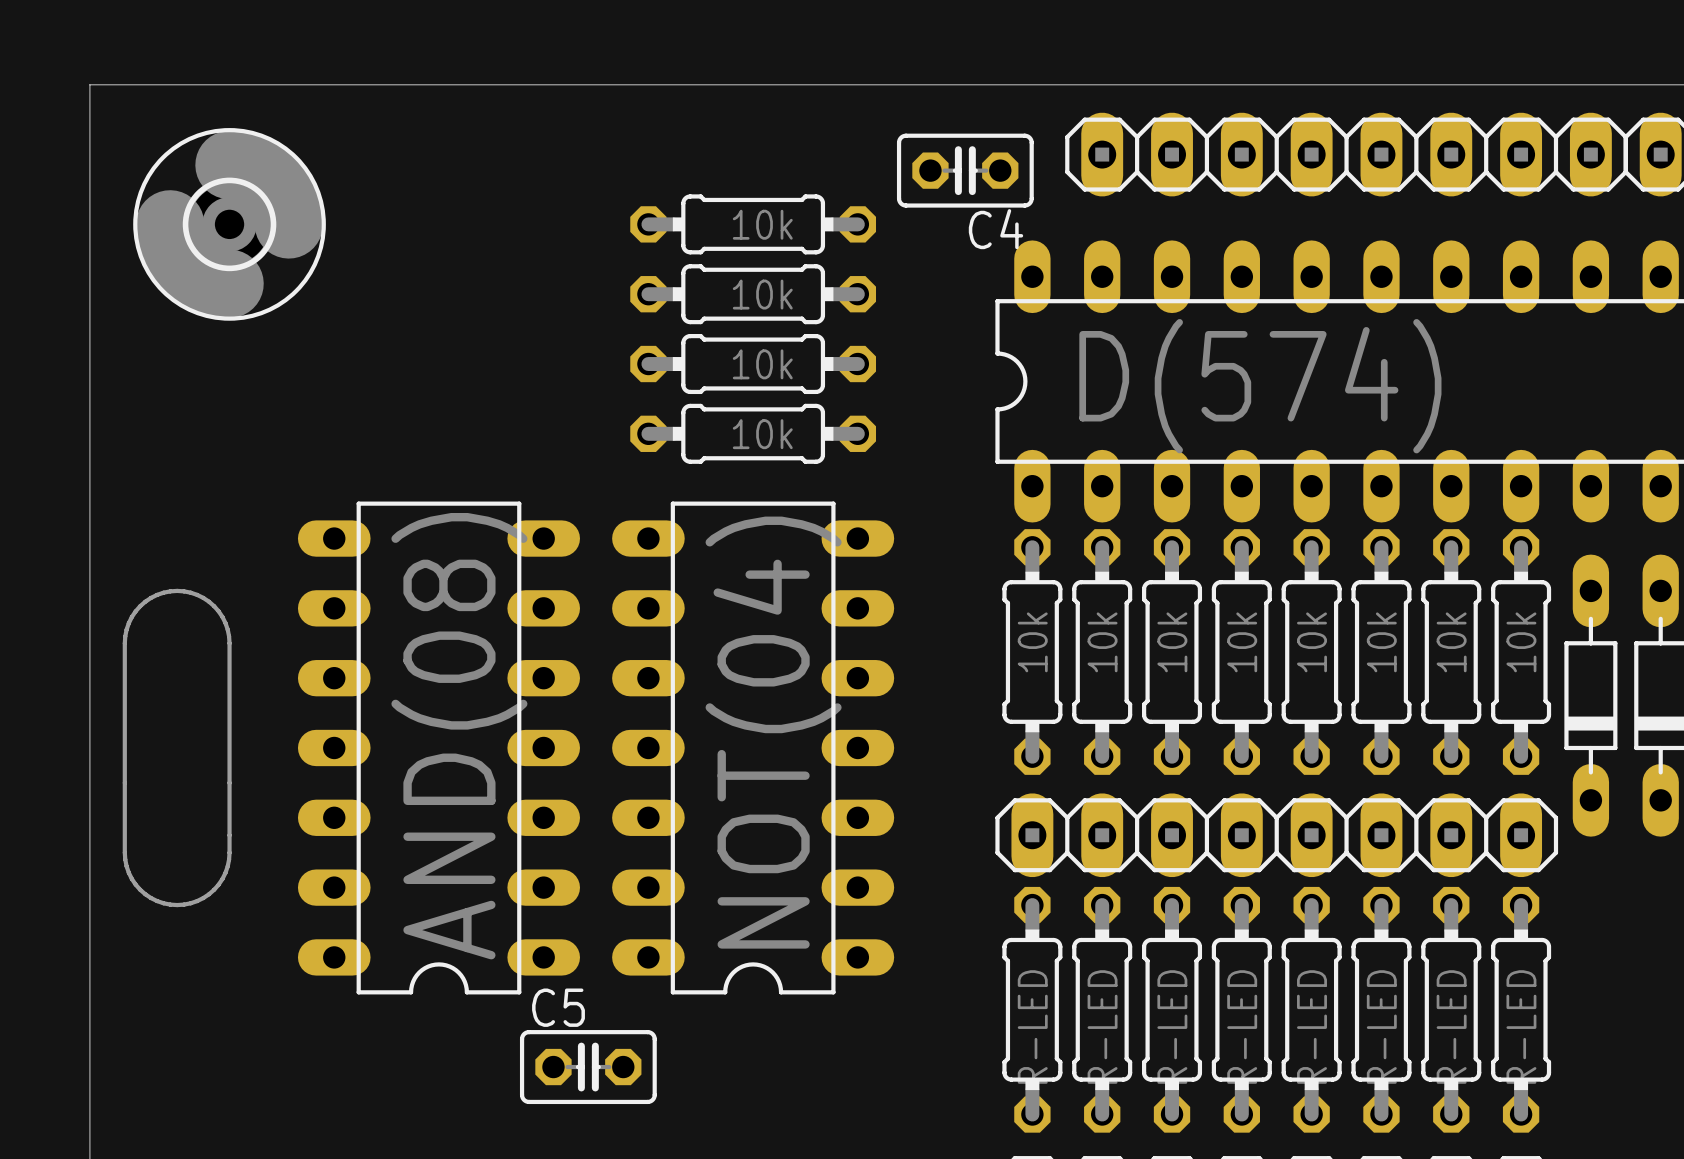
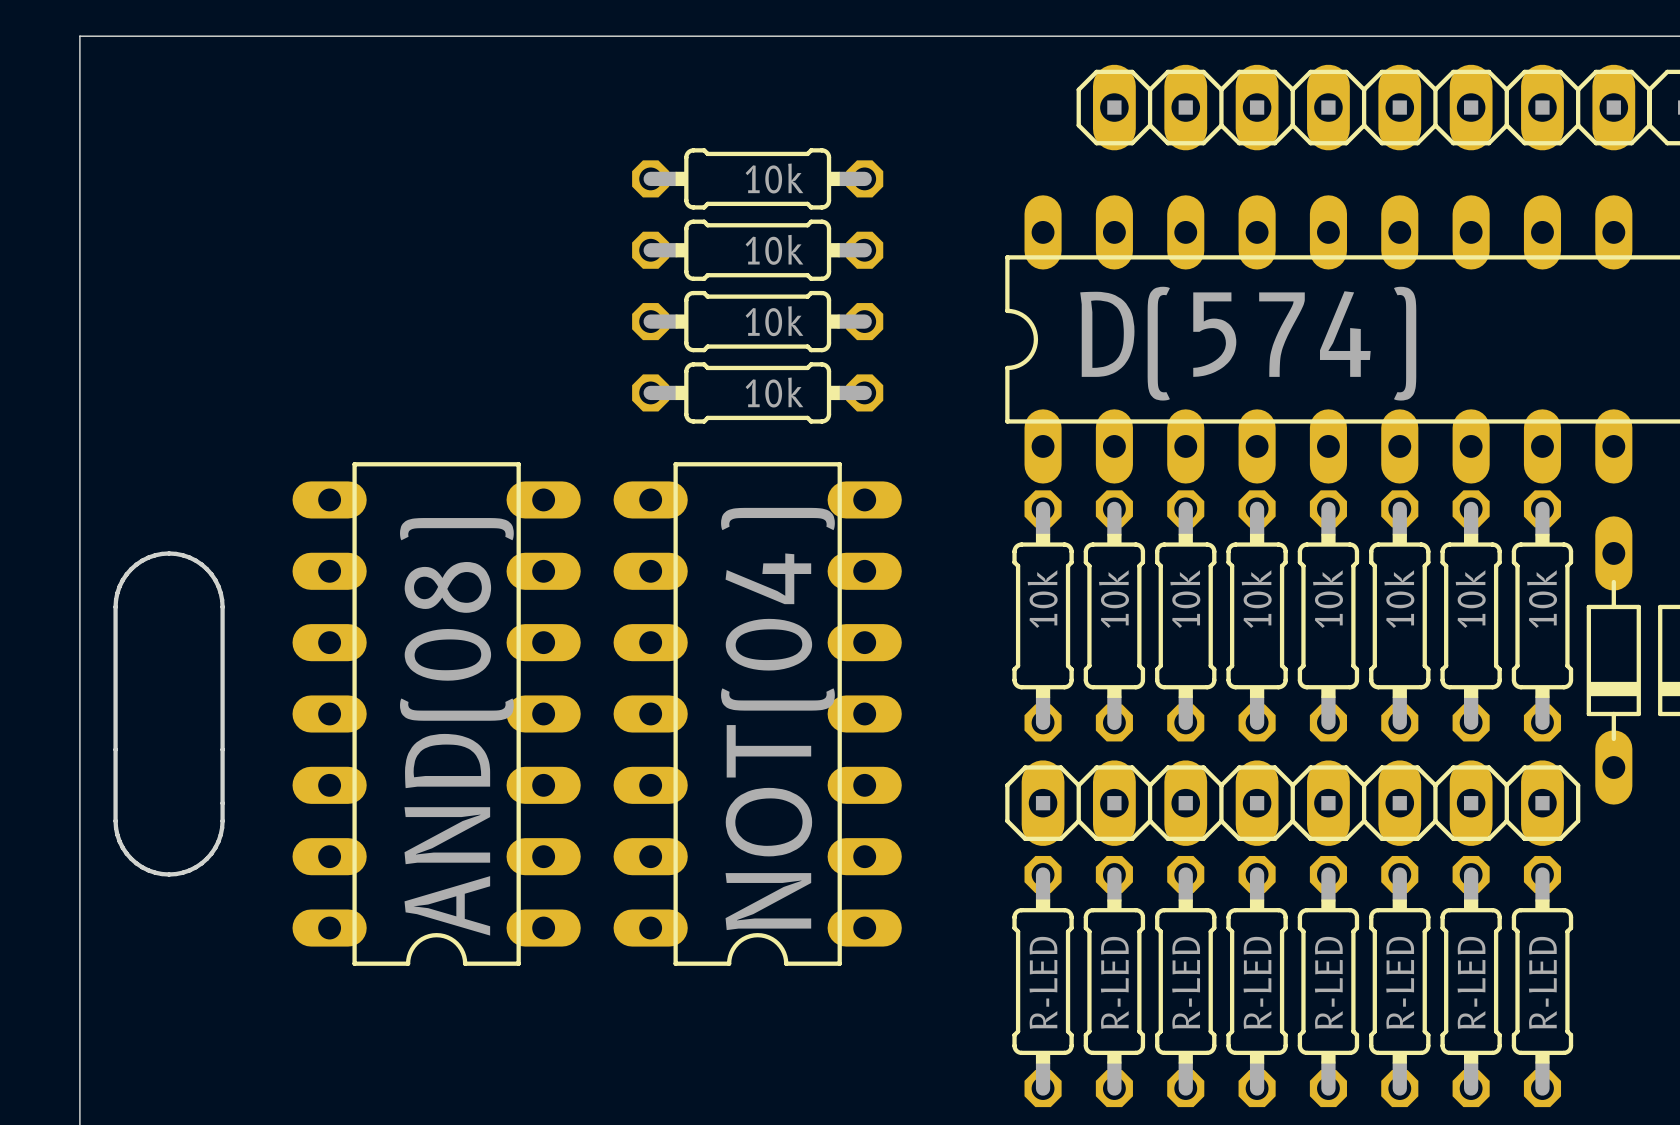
C4: (965, 170) -> none
part: (229, 224) -> none
C5: (588, 1067) -> none

